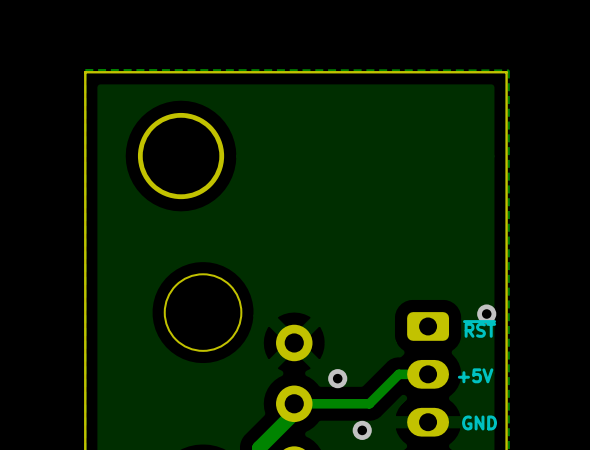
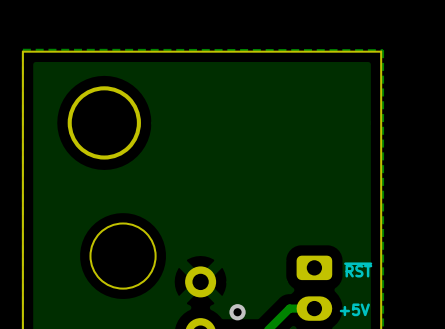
via: (486, 314) -> none

